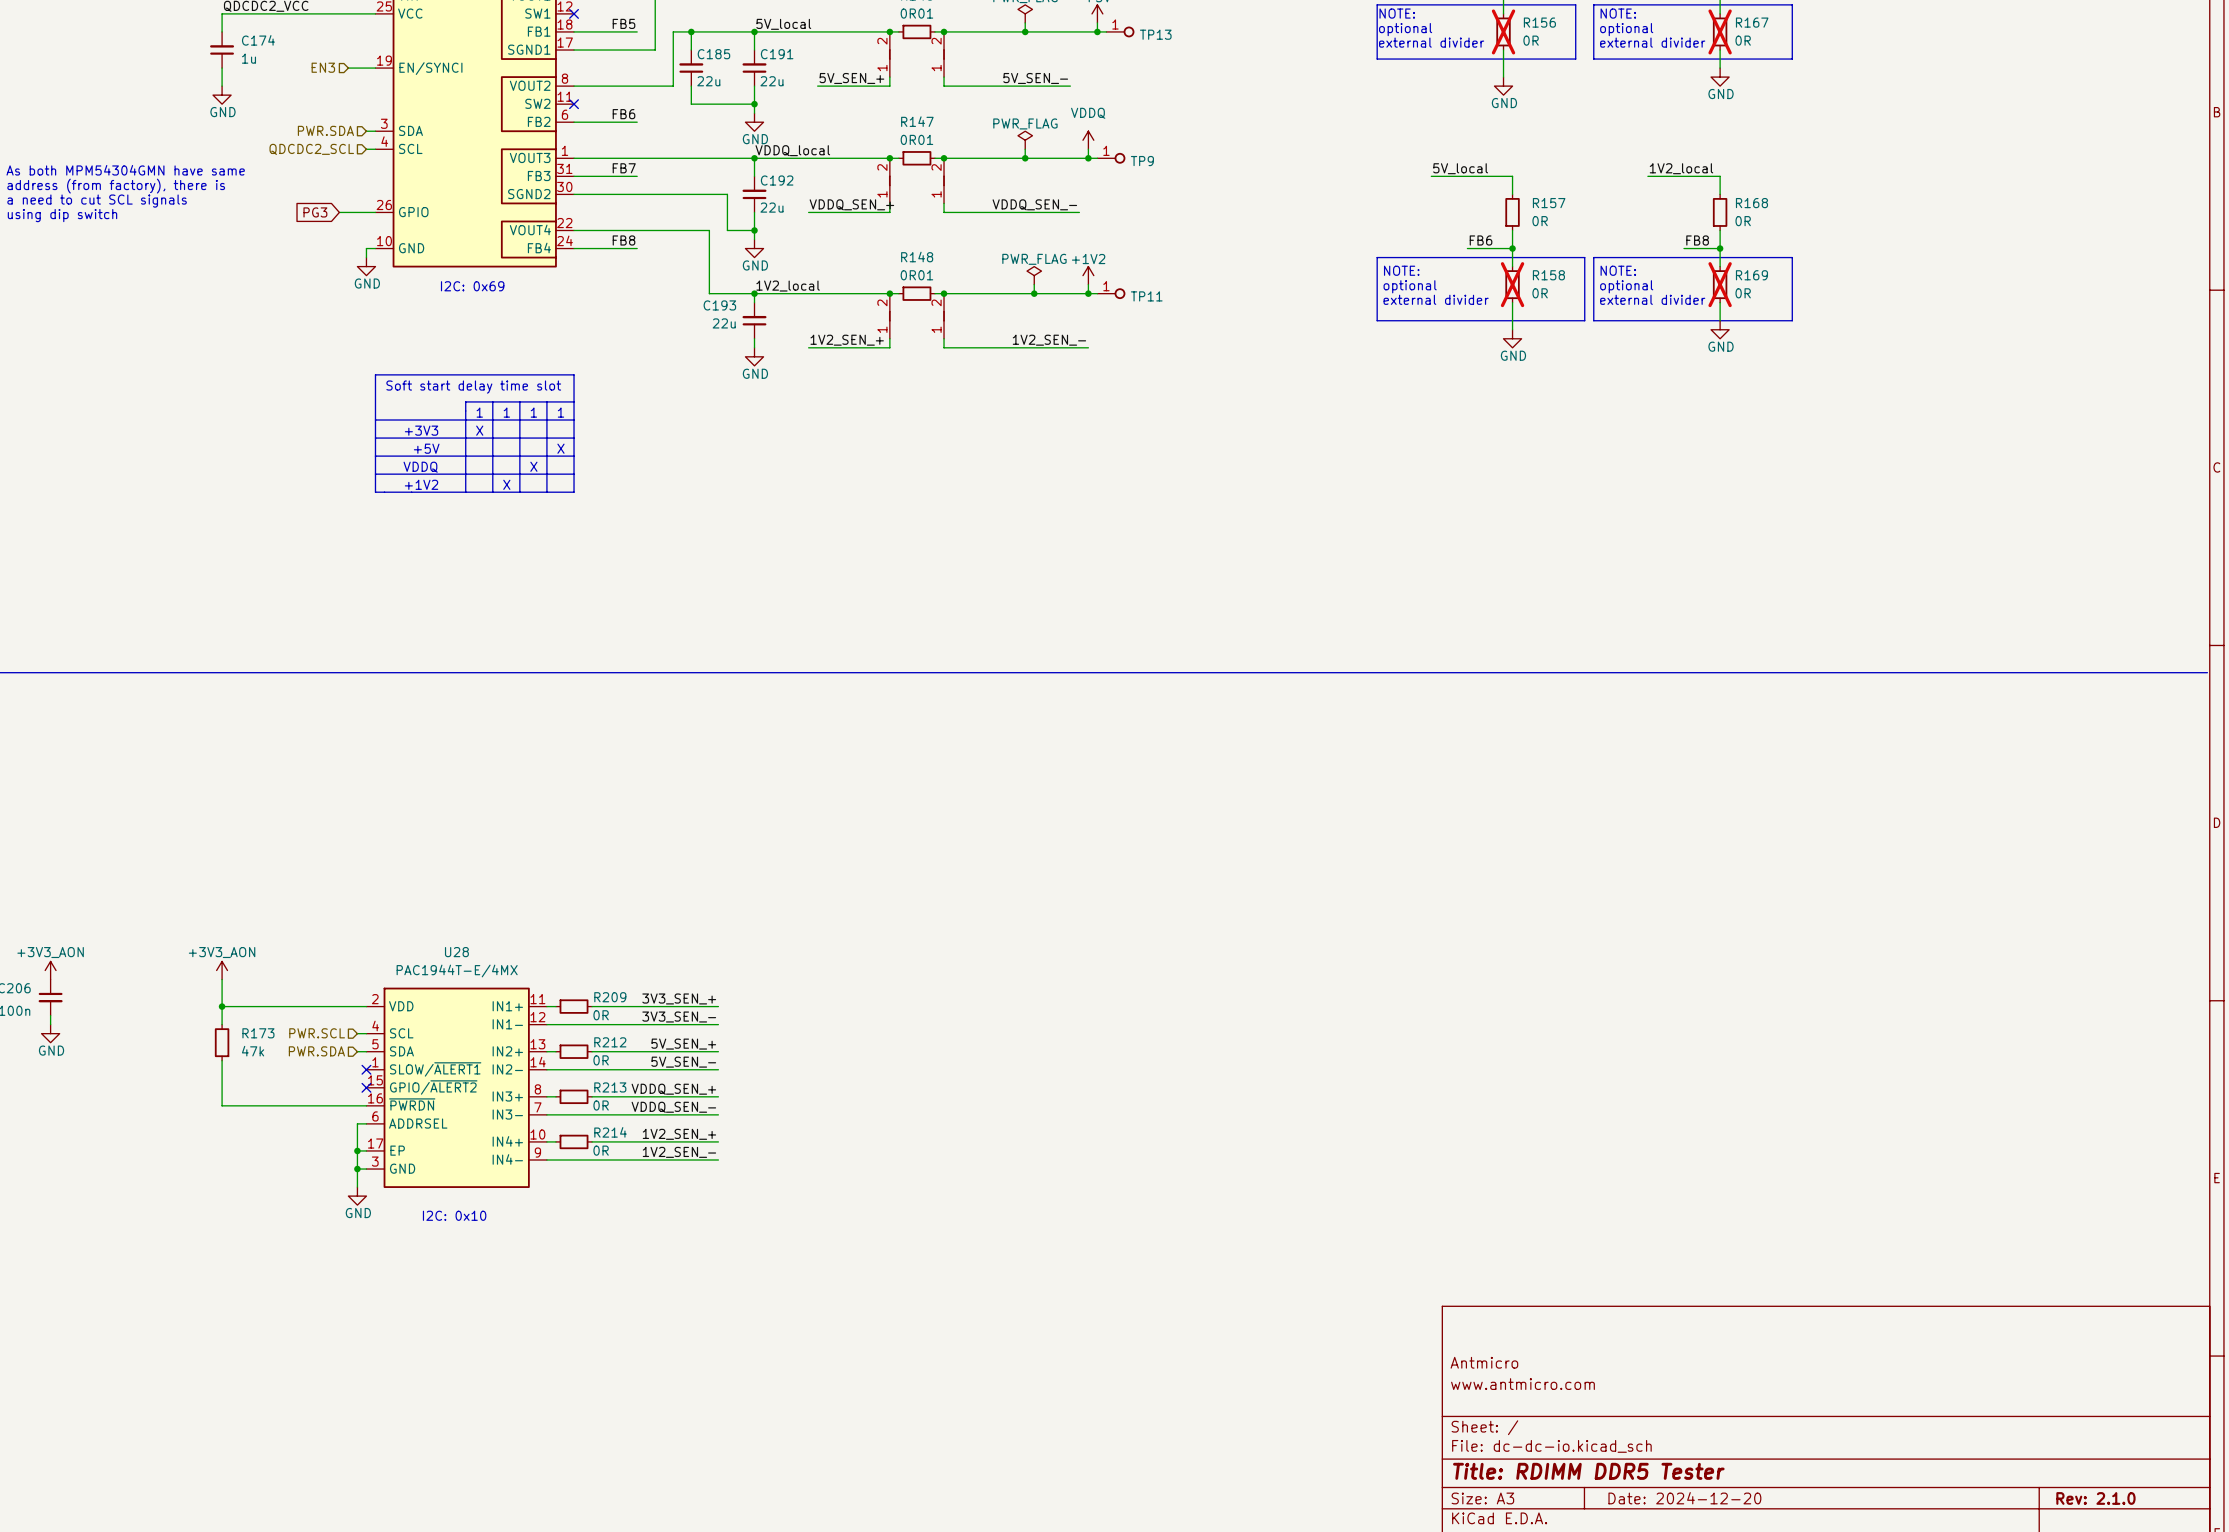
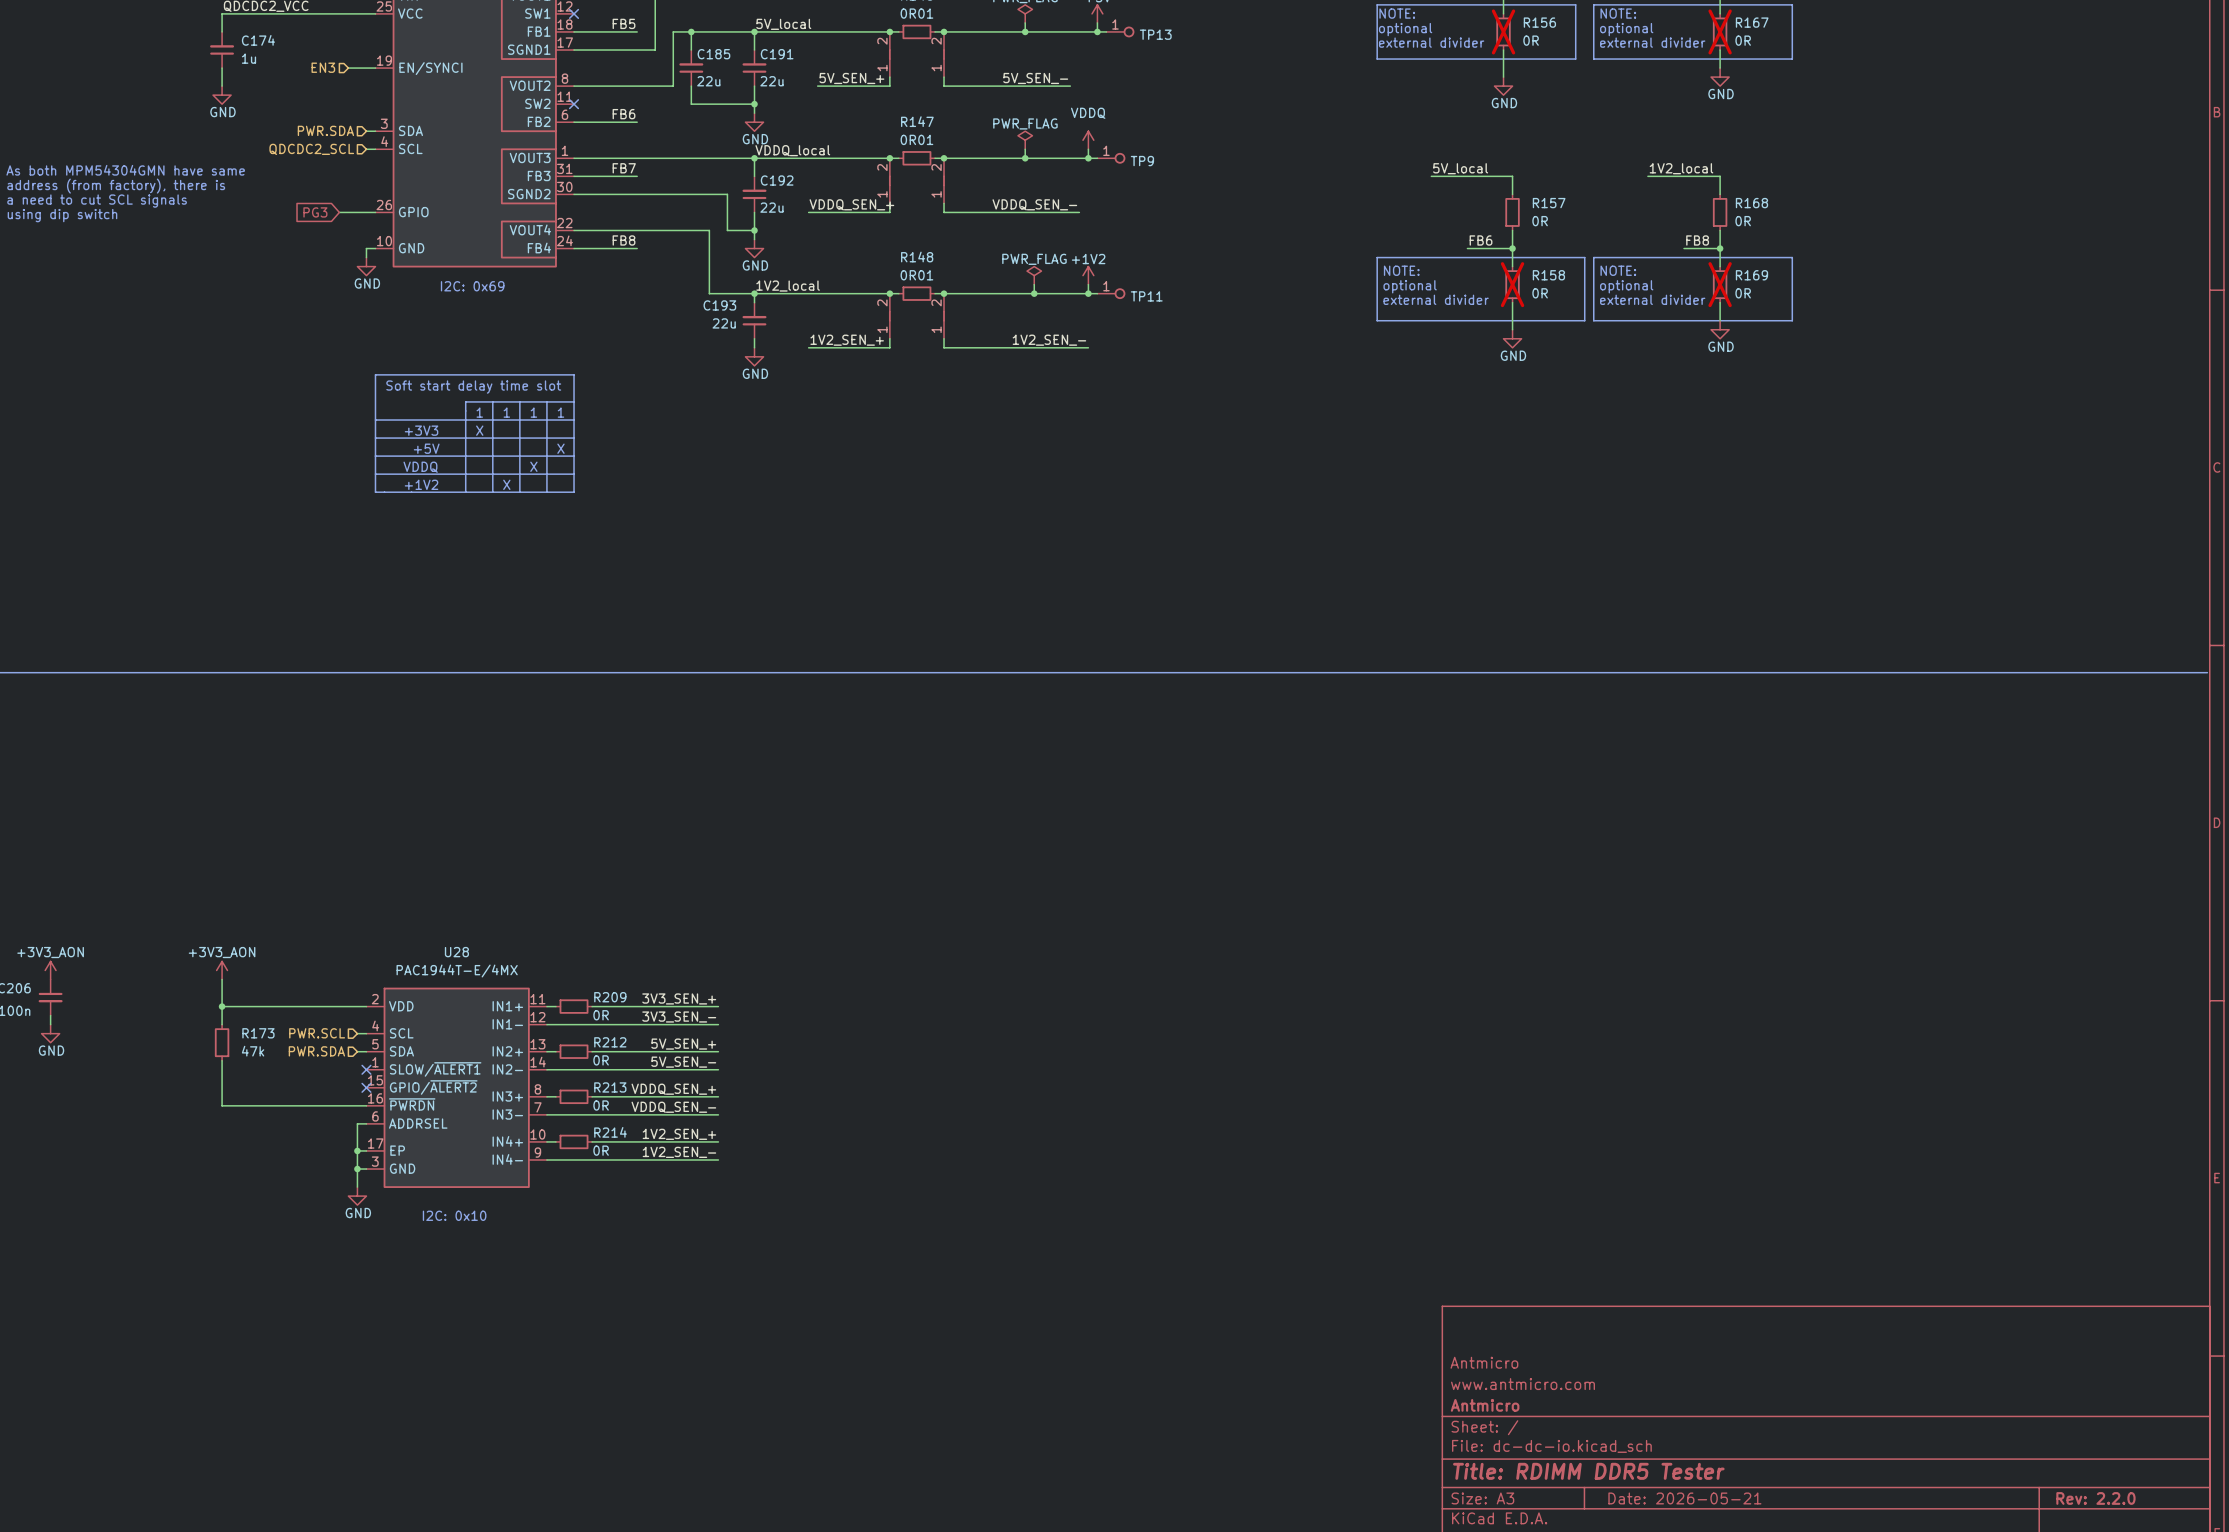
title block: none -> Antmicro (1485, 1405)
title block: Date: 2024-12-20 (1684, 1498) -> Date: 2026-05-21 (1684, 1498)
title block: Rev: 2.1.0 (2095, 1498) -> Rev: 2.2.0 (2095, 1498)

